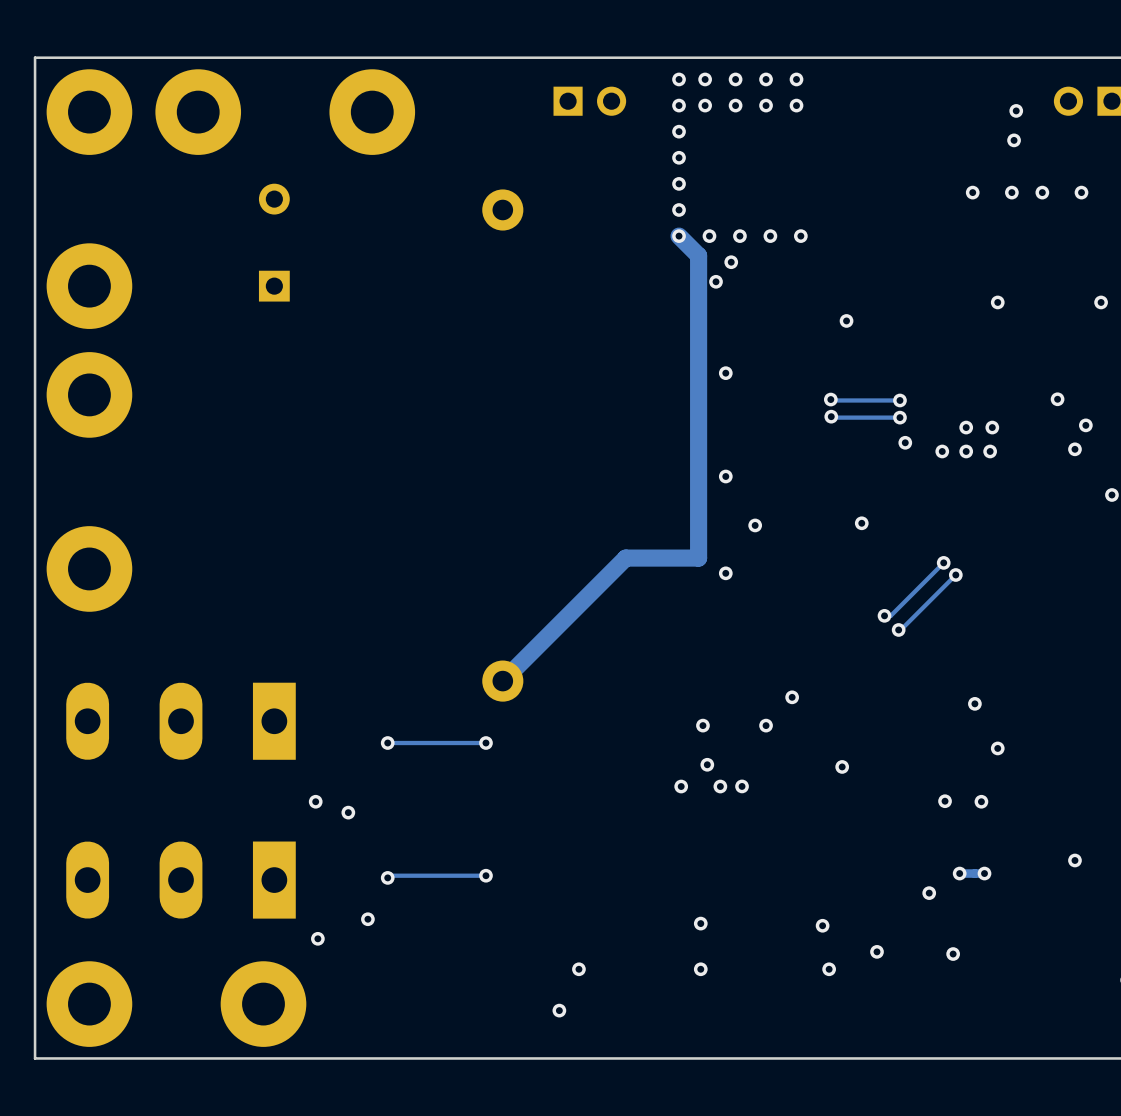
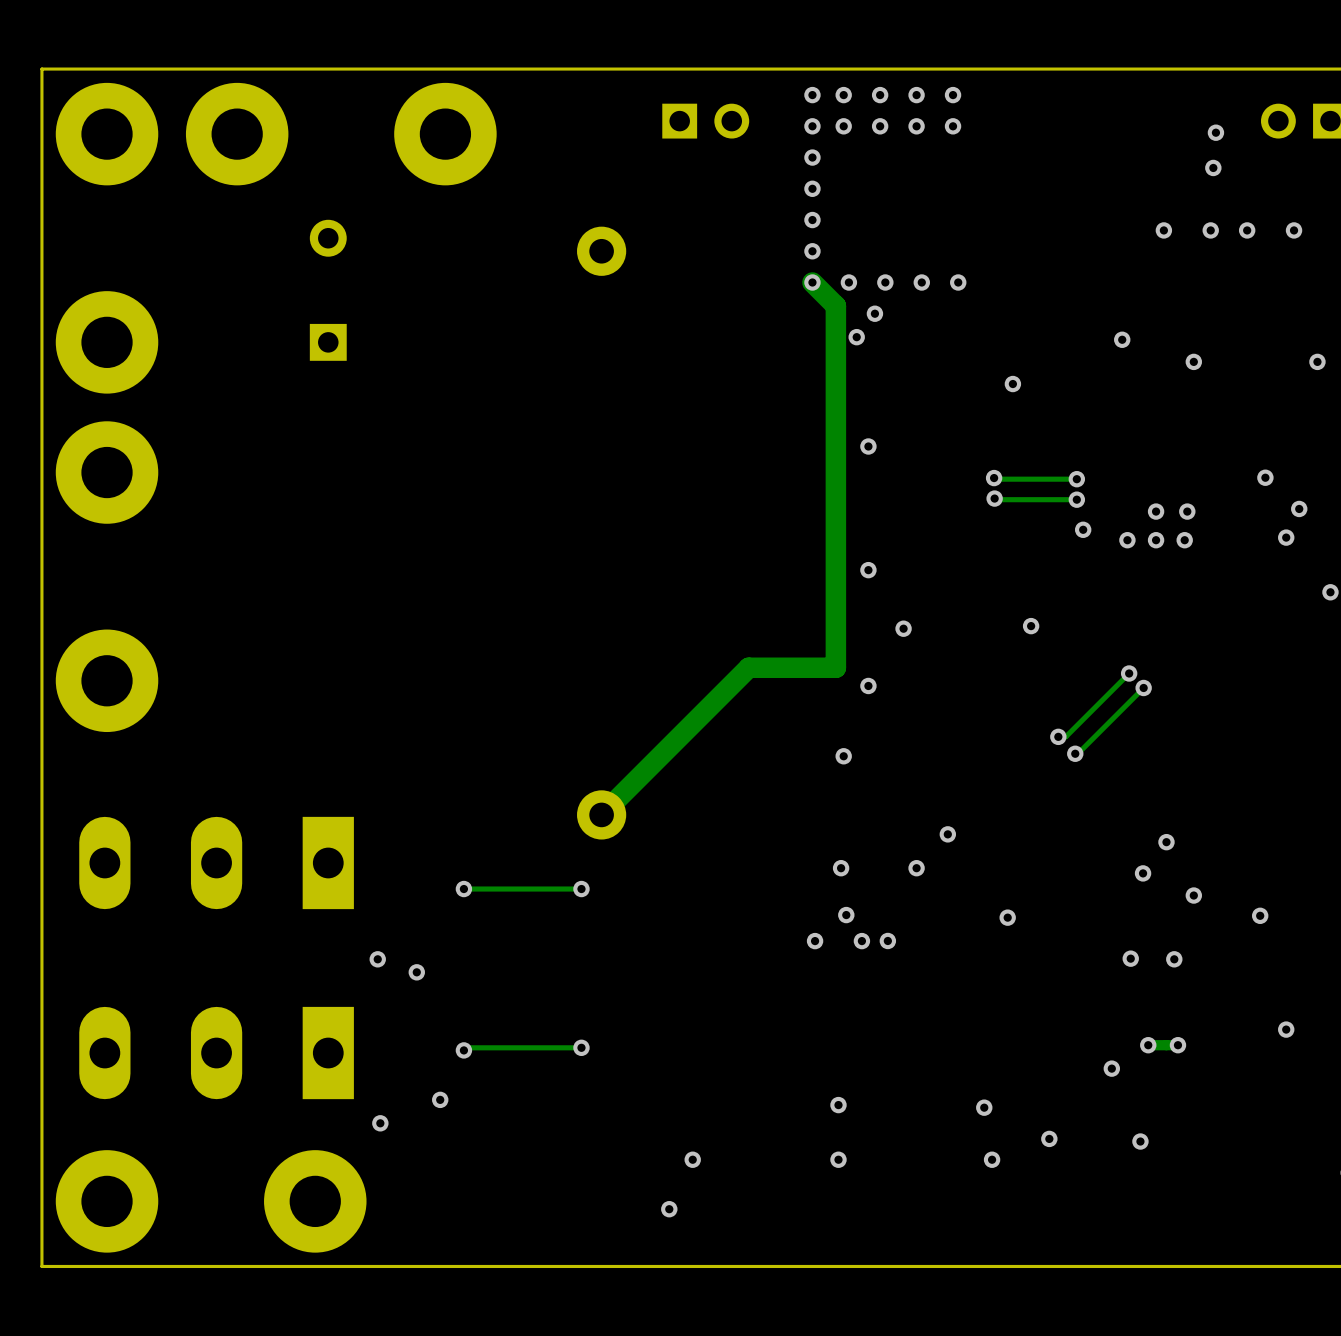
via: none -> (1122, 339)
via: none -> (843, 756)
via: none -> (1143, 873)
via: none -> (1260, 915)

